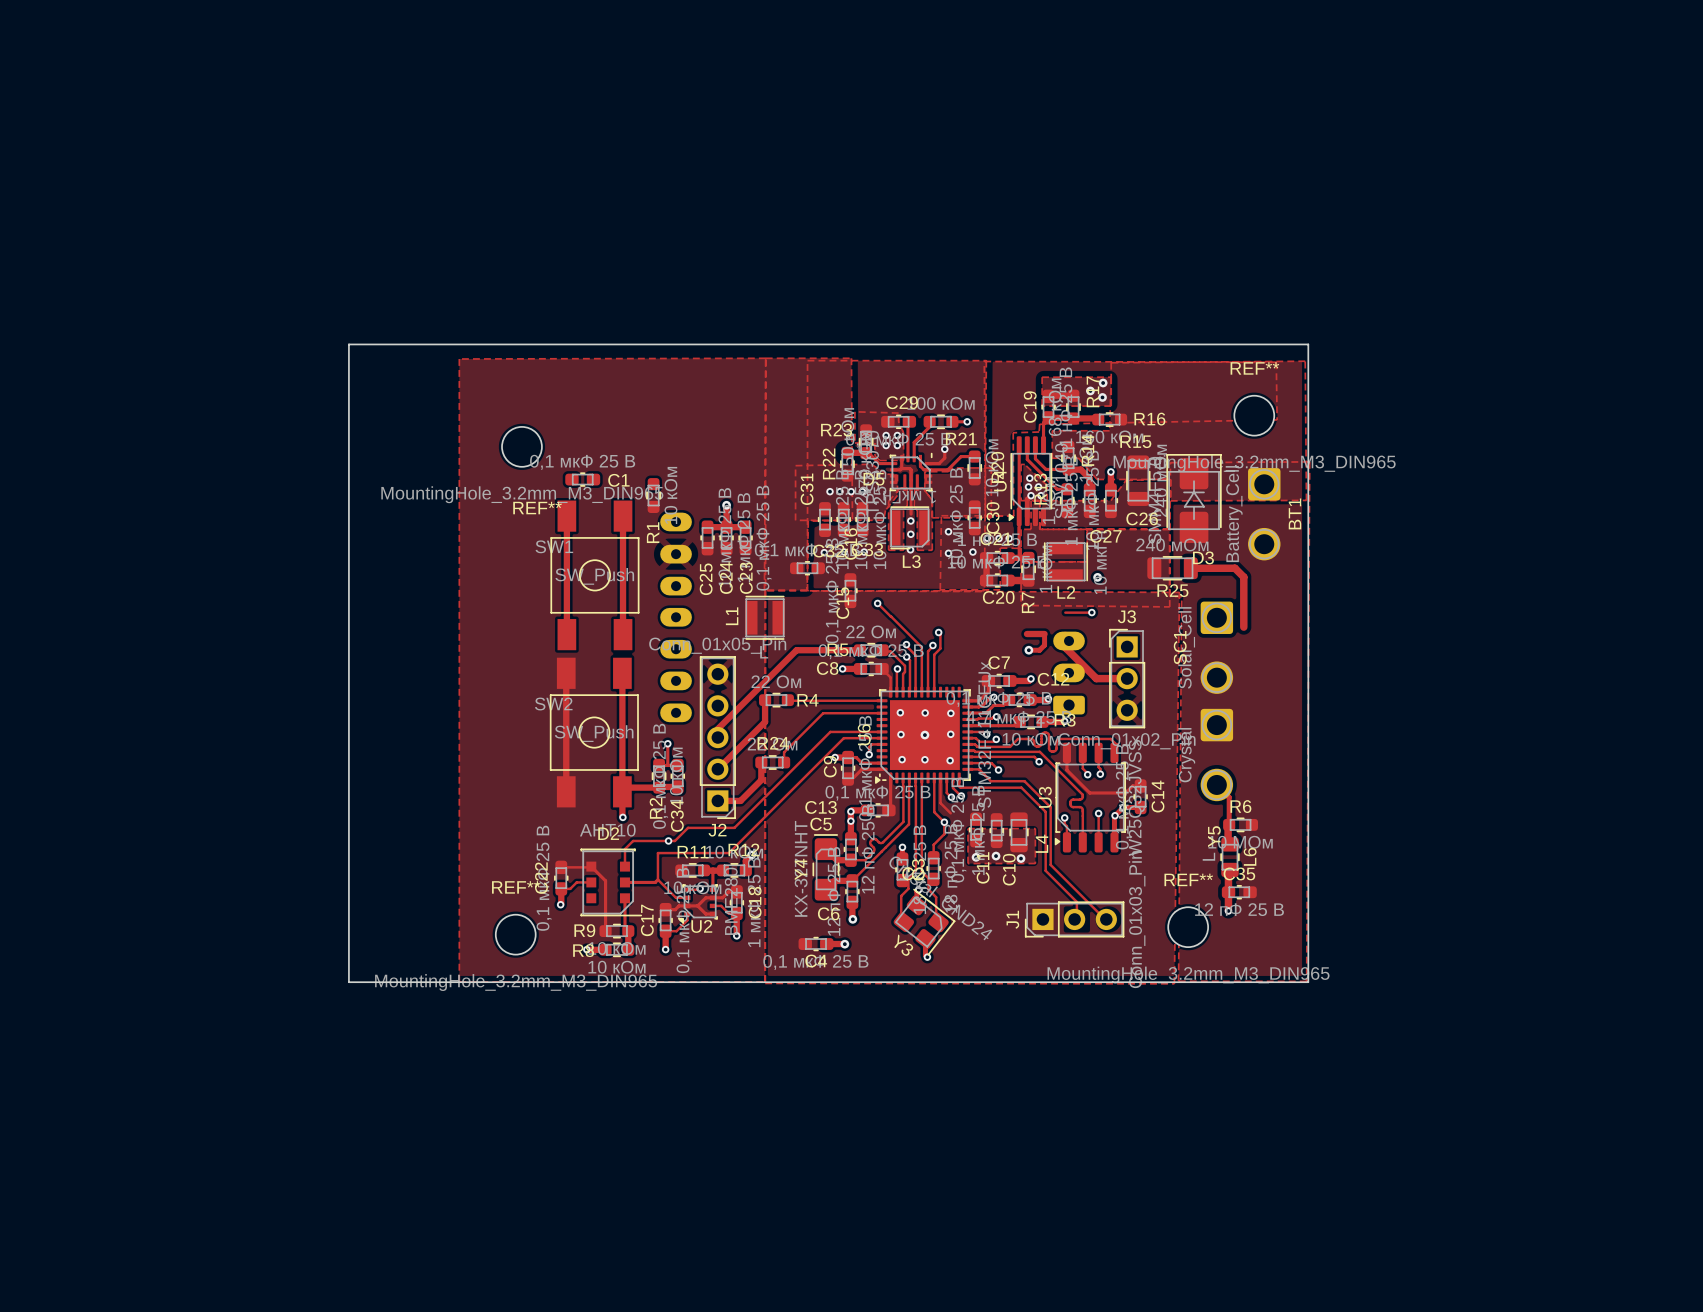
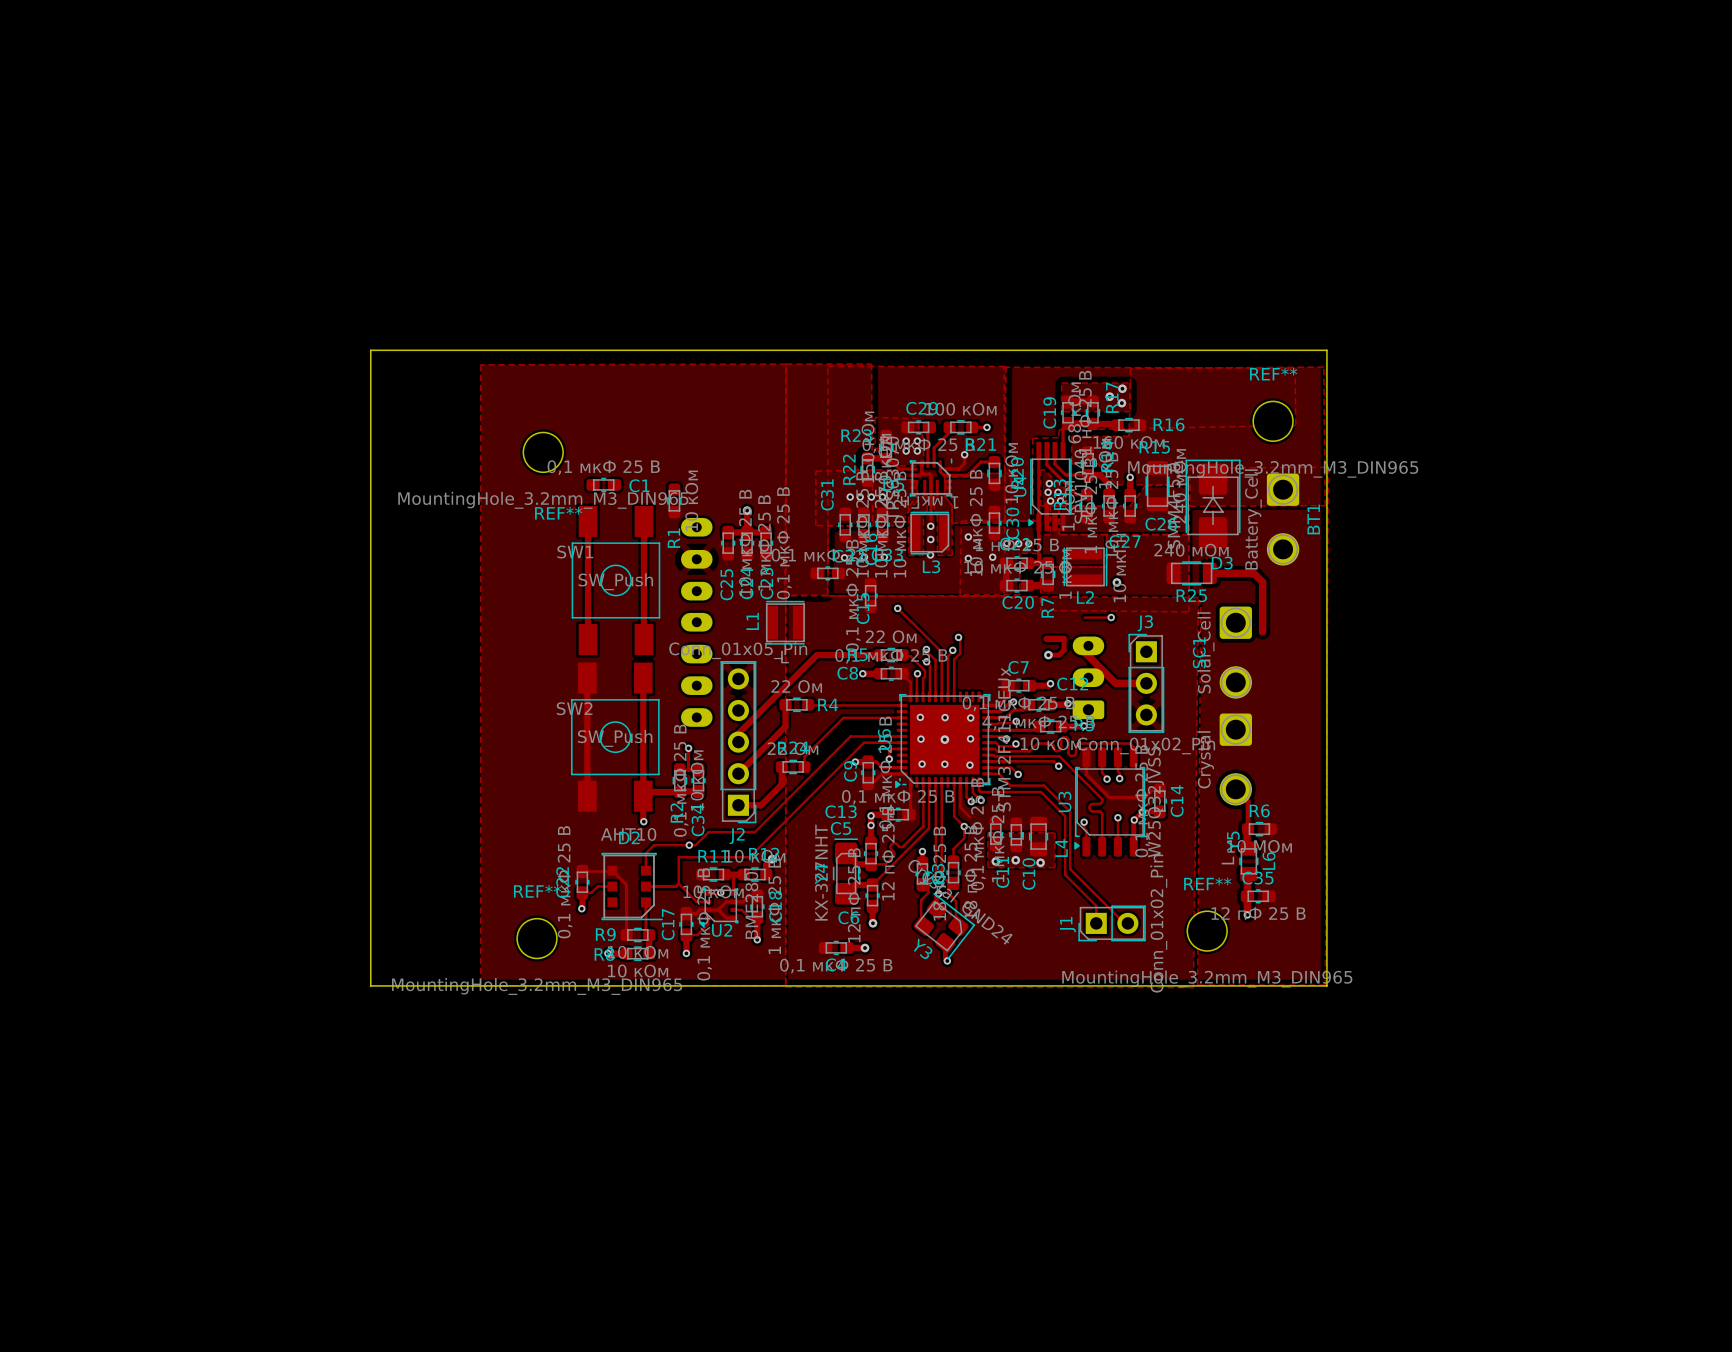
J1 footprint: [1024, 901, 1125, 938] -> [1078, 905, 1146, 942]
J1 value: Conn_01x03_Pin (1137, 919) -> Conn_01x02_Pin (1158, 923)

